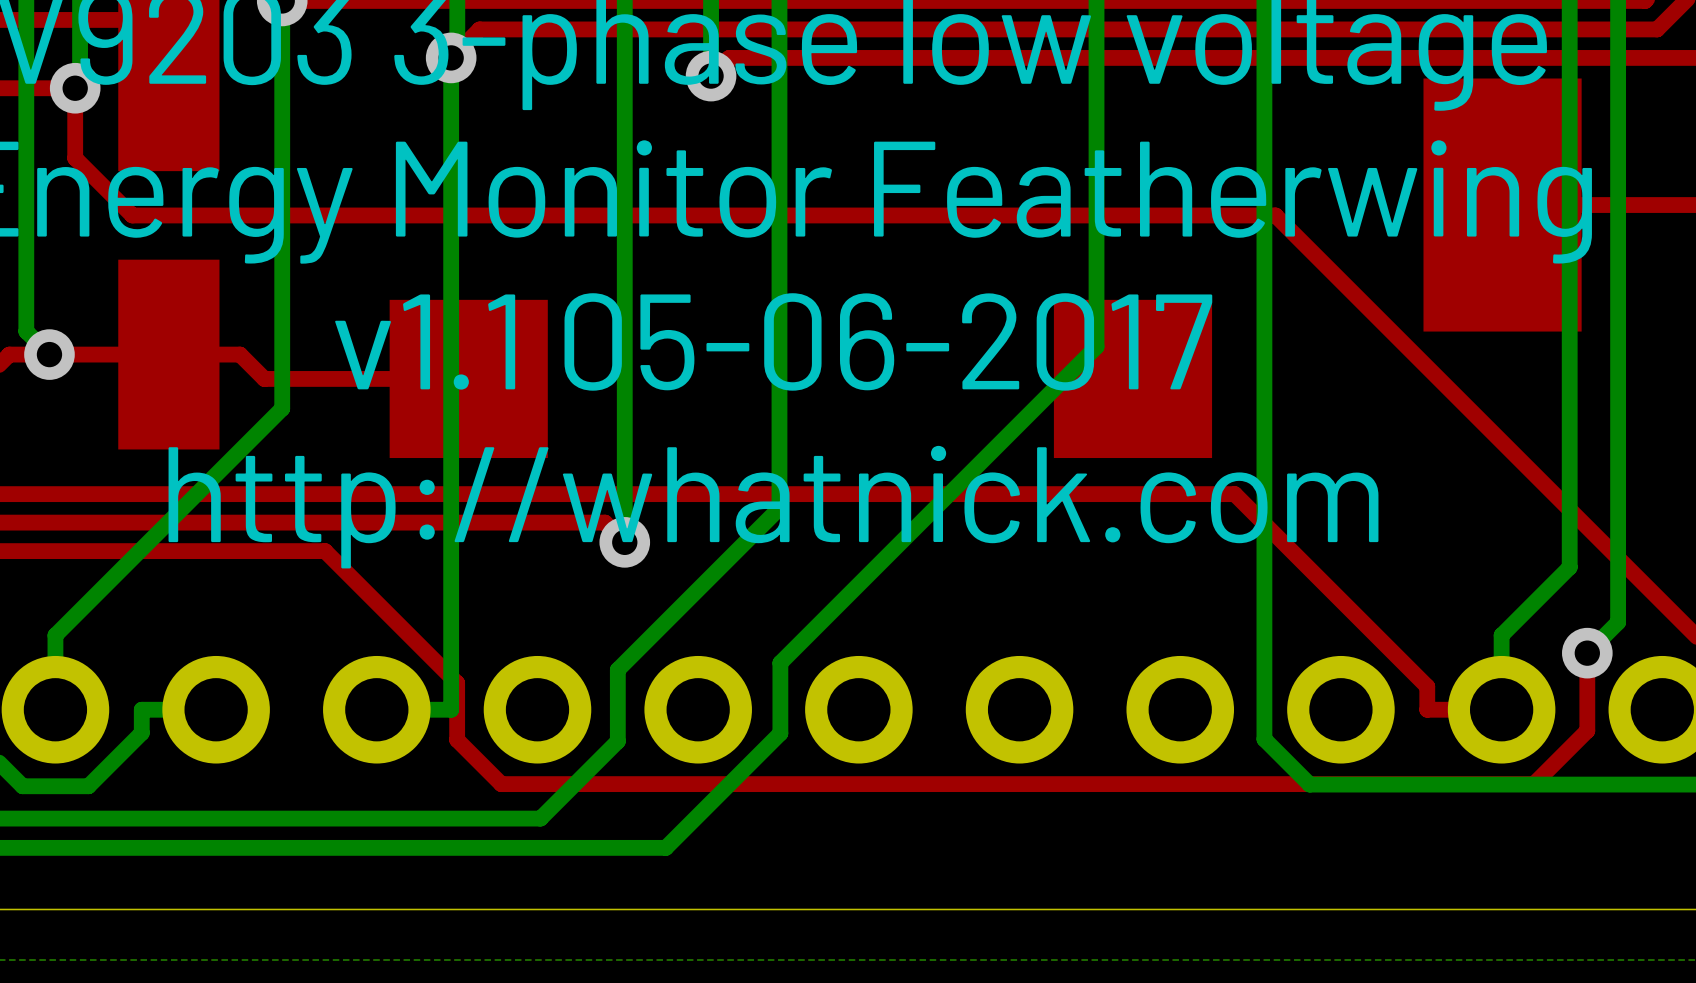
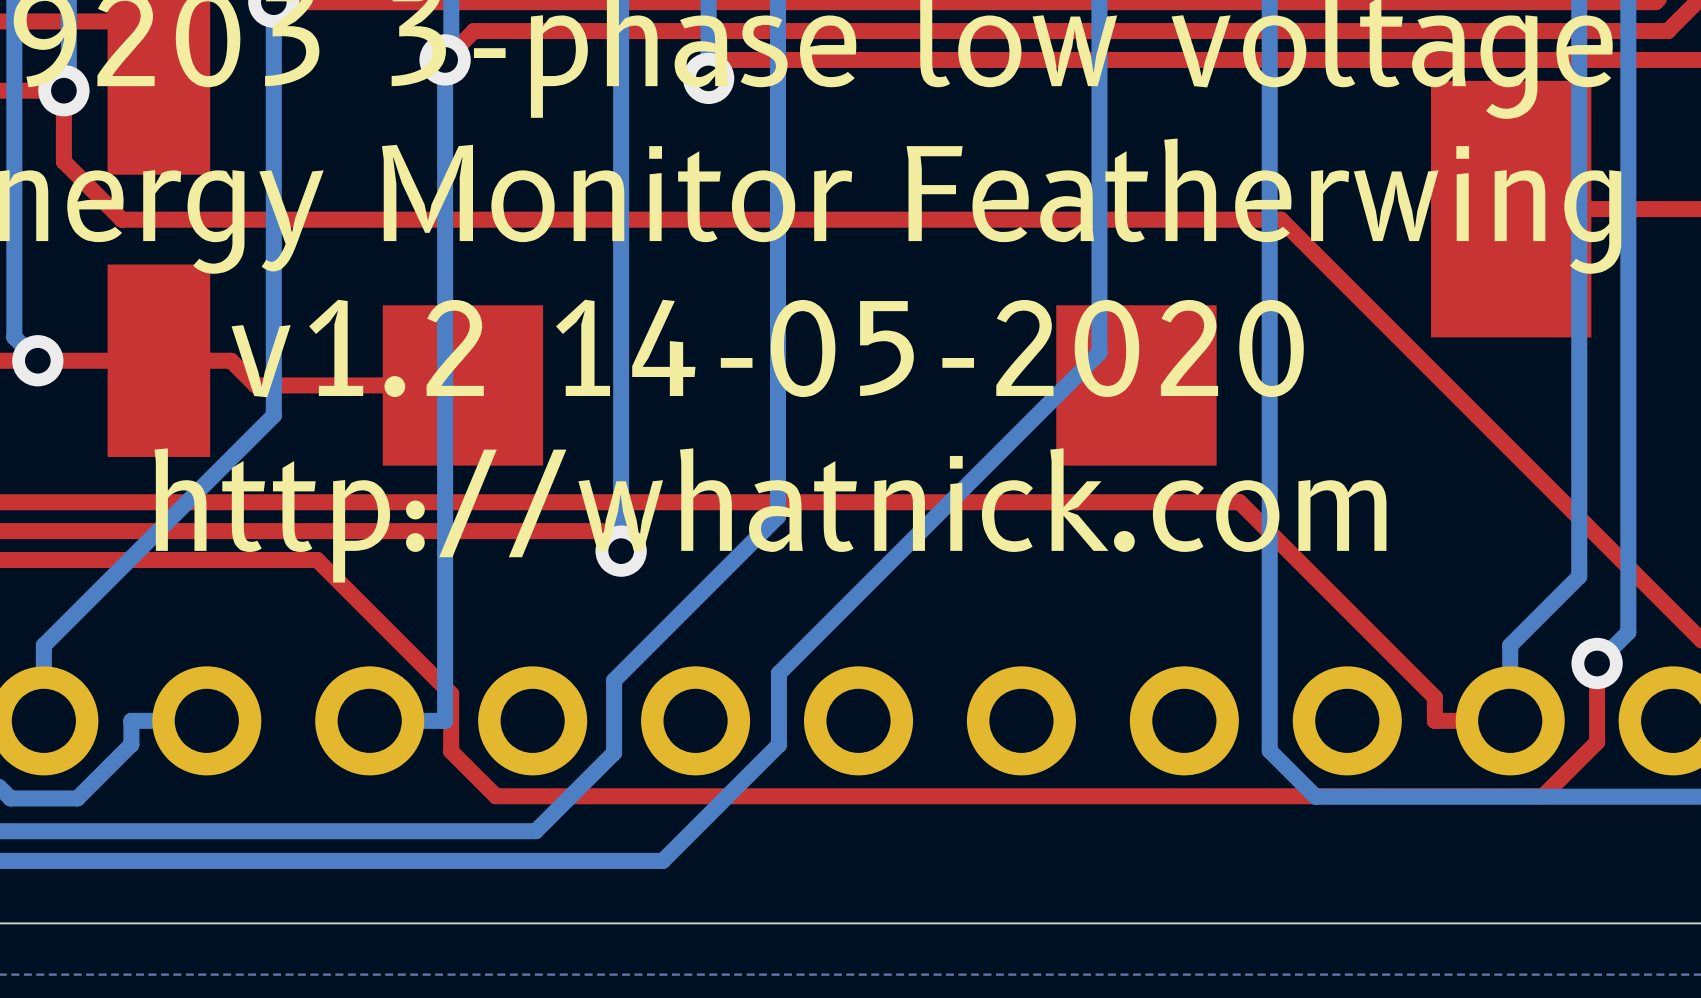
text: v1.1 05-06-2017 (773, 341) -> v1.2 14-05-2020 (767, 348)

